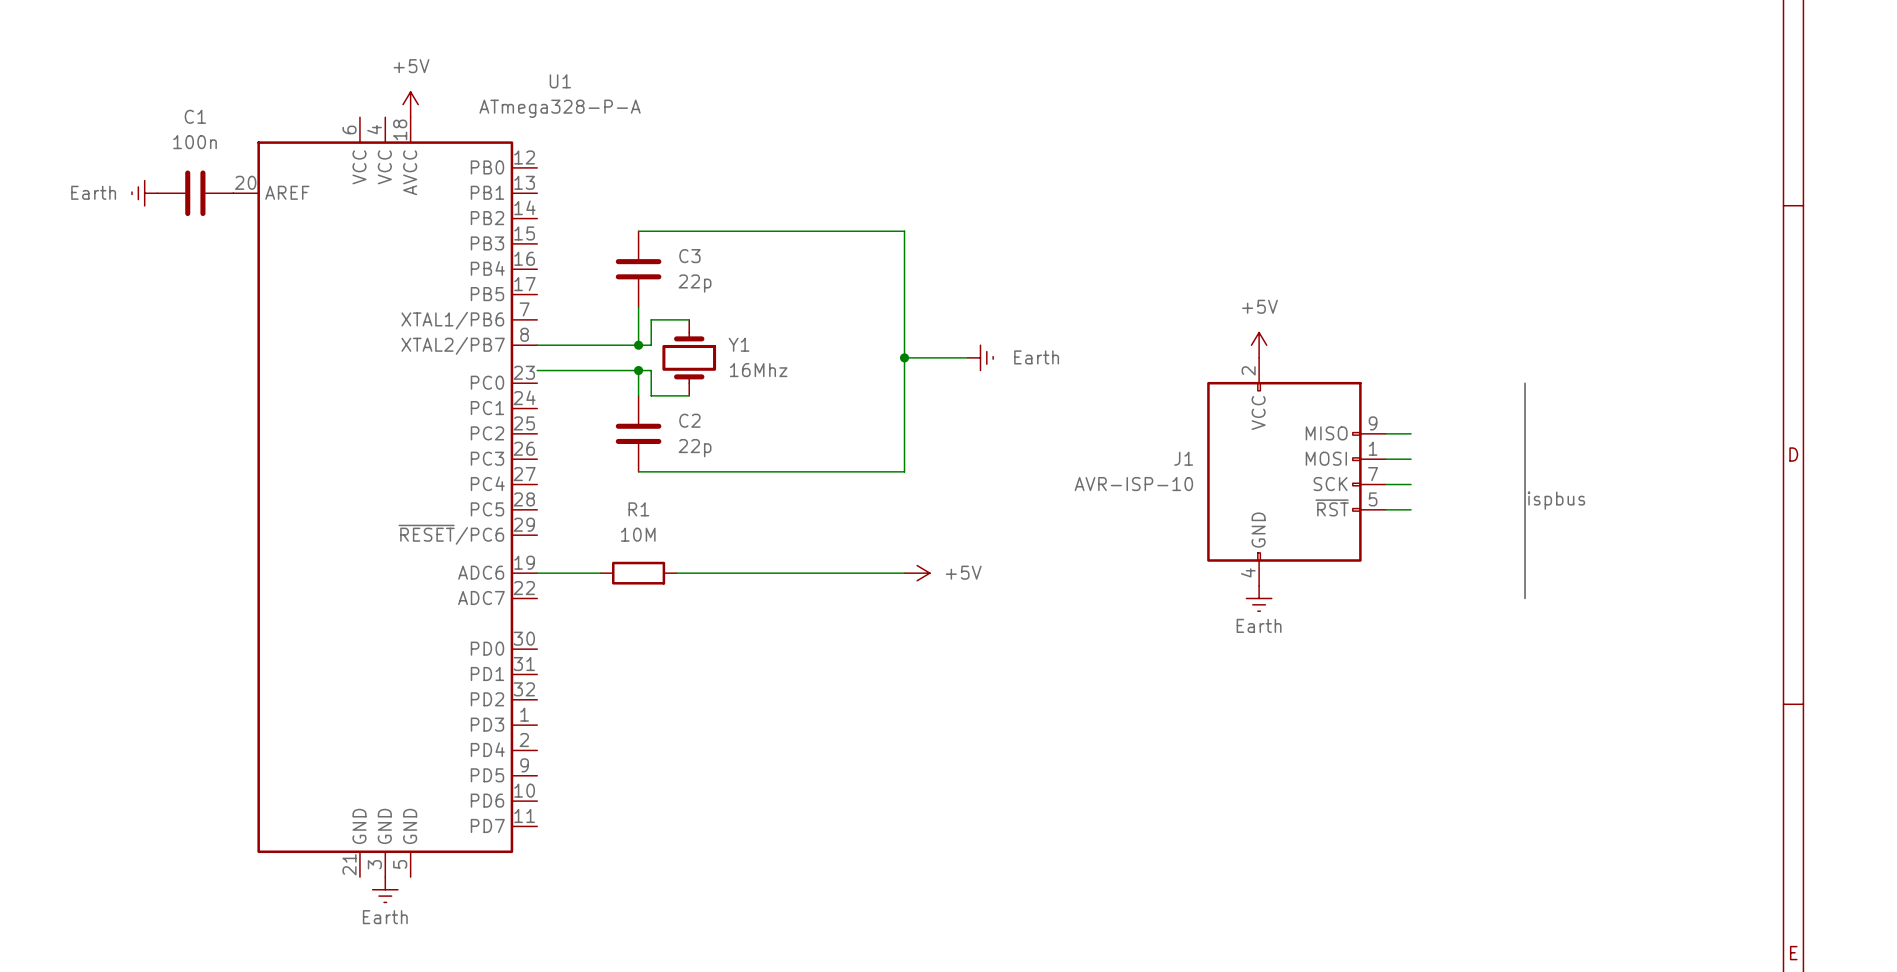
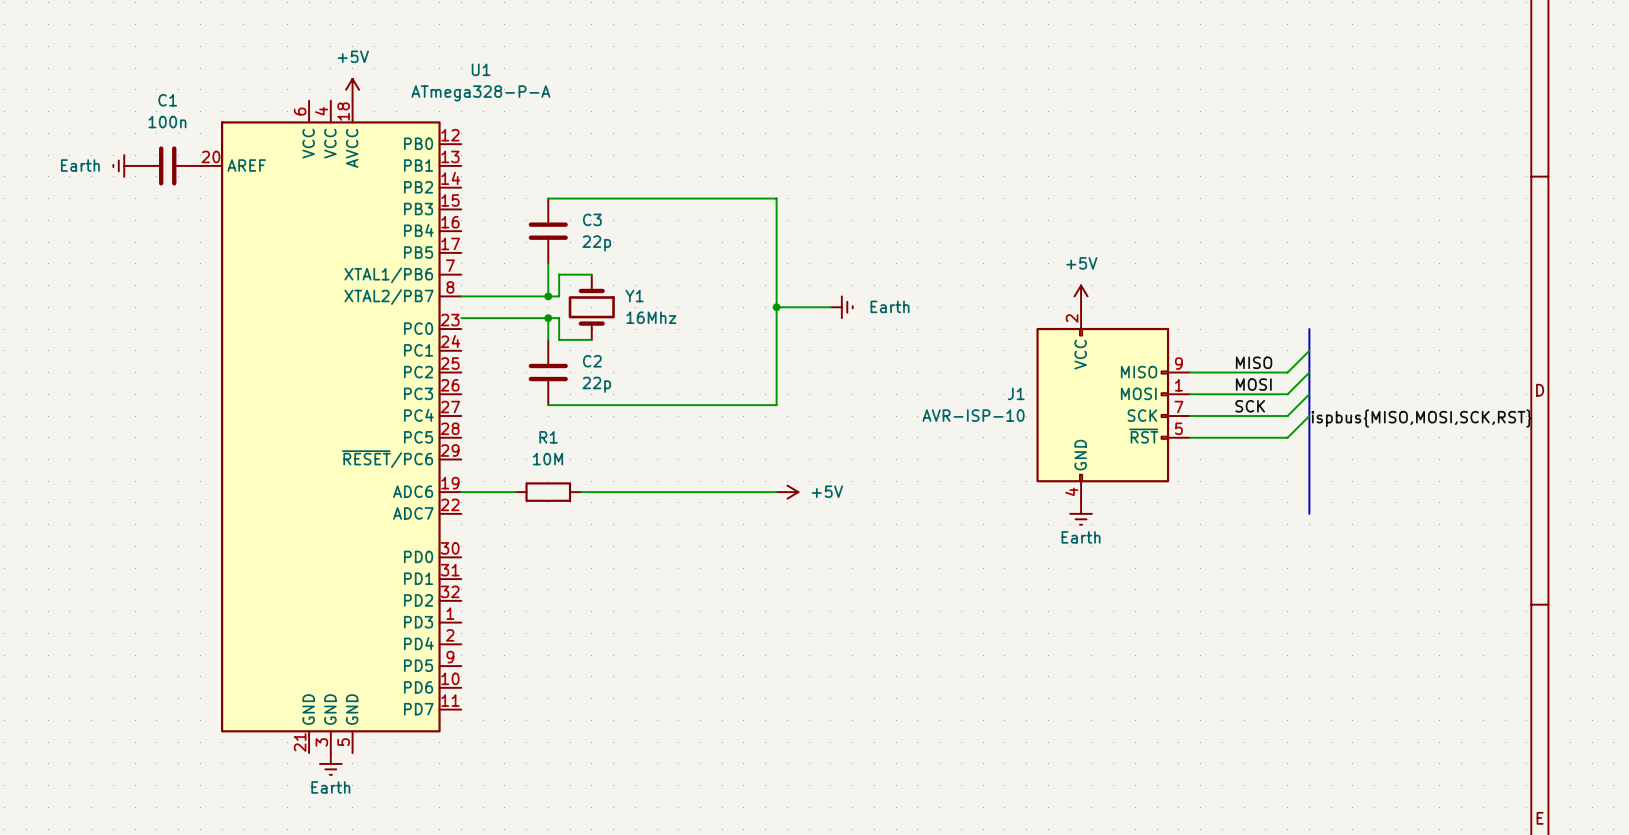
wire: none -> (1309, 350) (1287, 372) (1211, 372)
label: none -> MISO (1254, 362)
wire: none -> (1309, 372) (1287, 394) (1211, 394)
label: none -> MOSI (1253, 384)
wire: none -> (1309, 394) (1287, 416) (1211, 416)
label: none -> SCK (1250, 406)
wire: none -> (1309, 416) (1287, 437) (1211, 437)
label: none -> ispbus{MISO,MOSI,SCK,RST} (1421, 418)
label: ispbus (1556, 500) -> none

